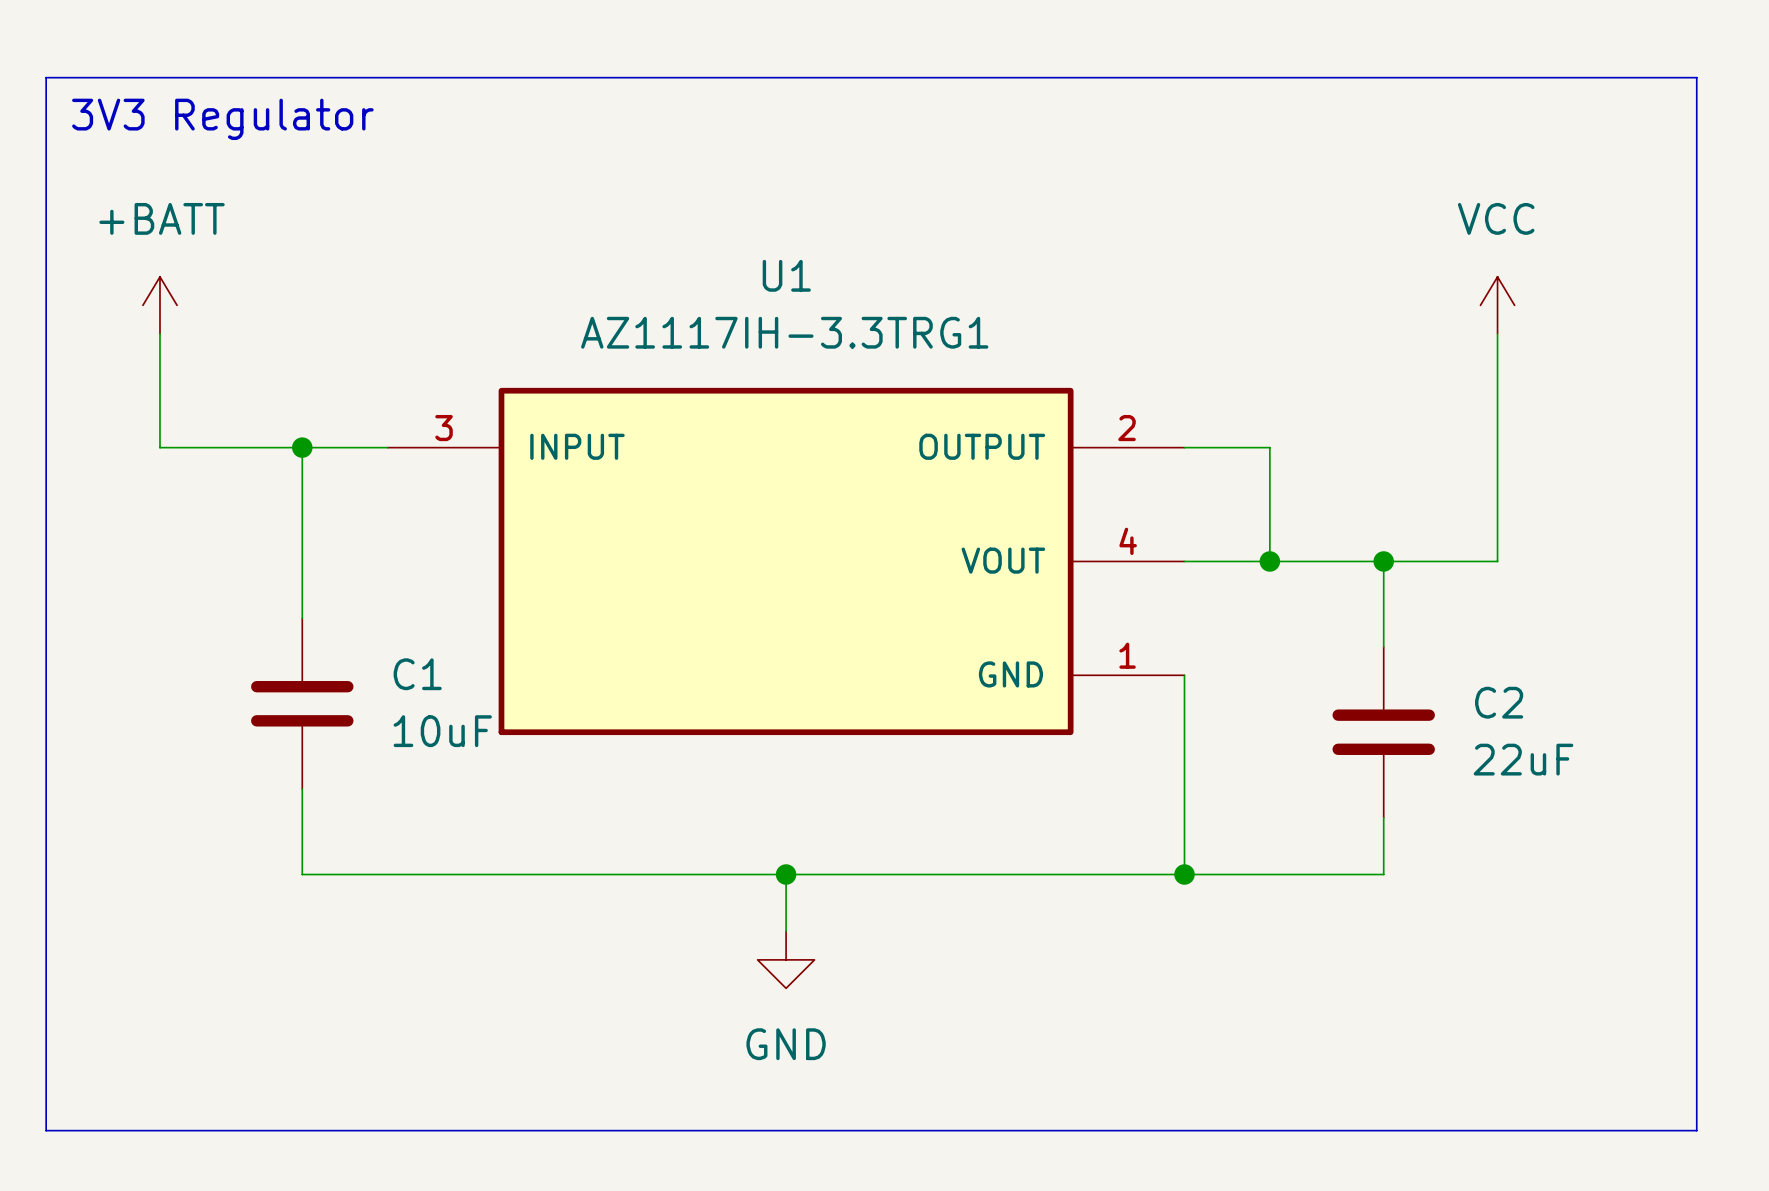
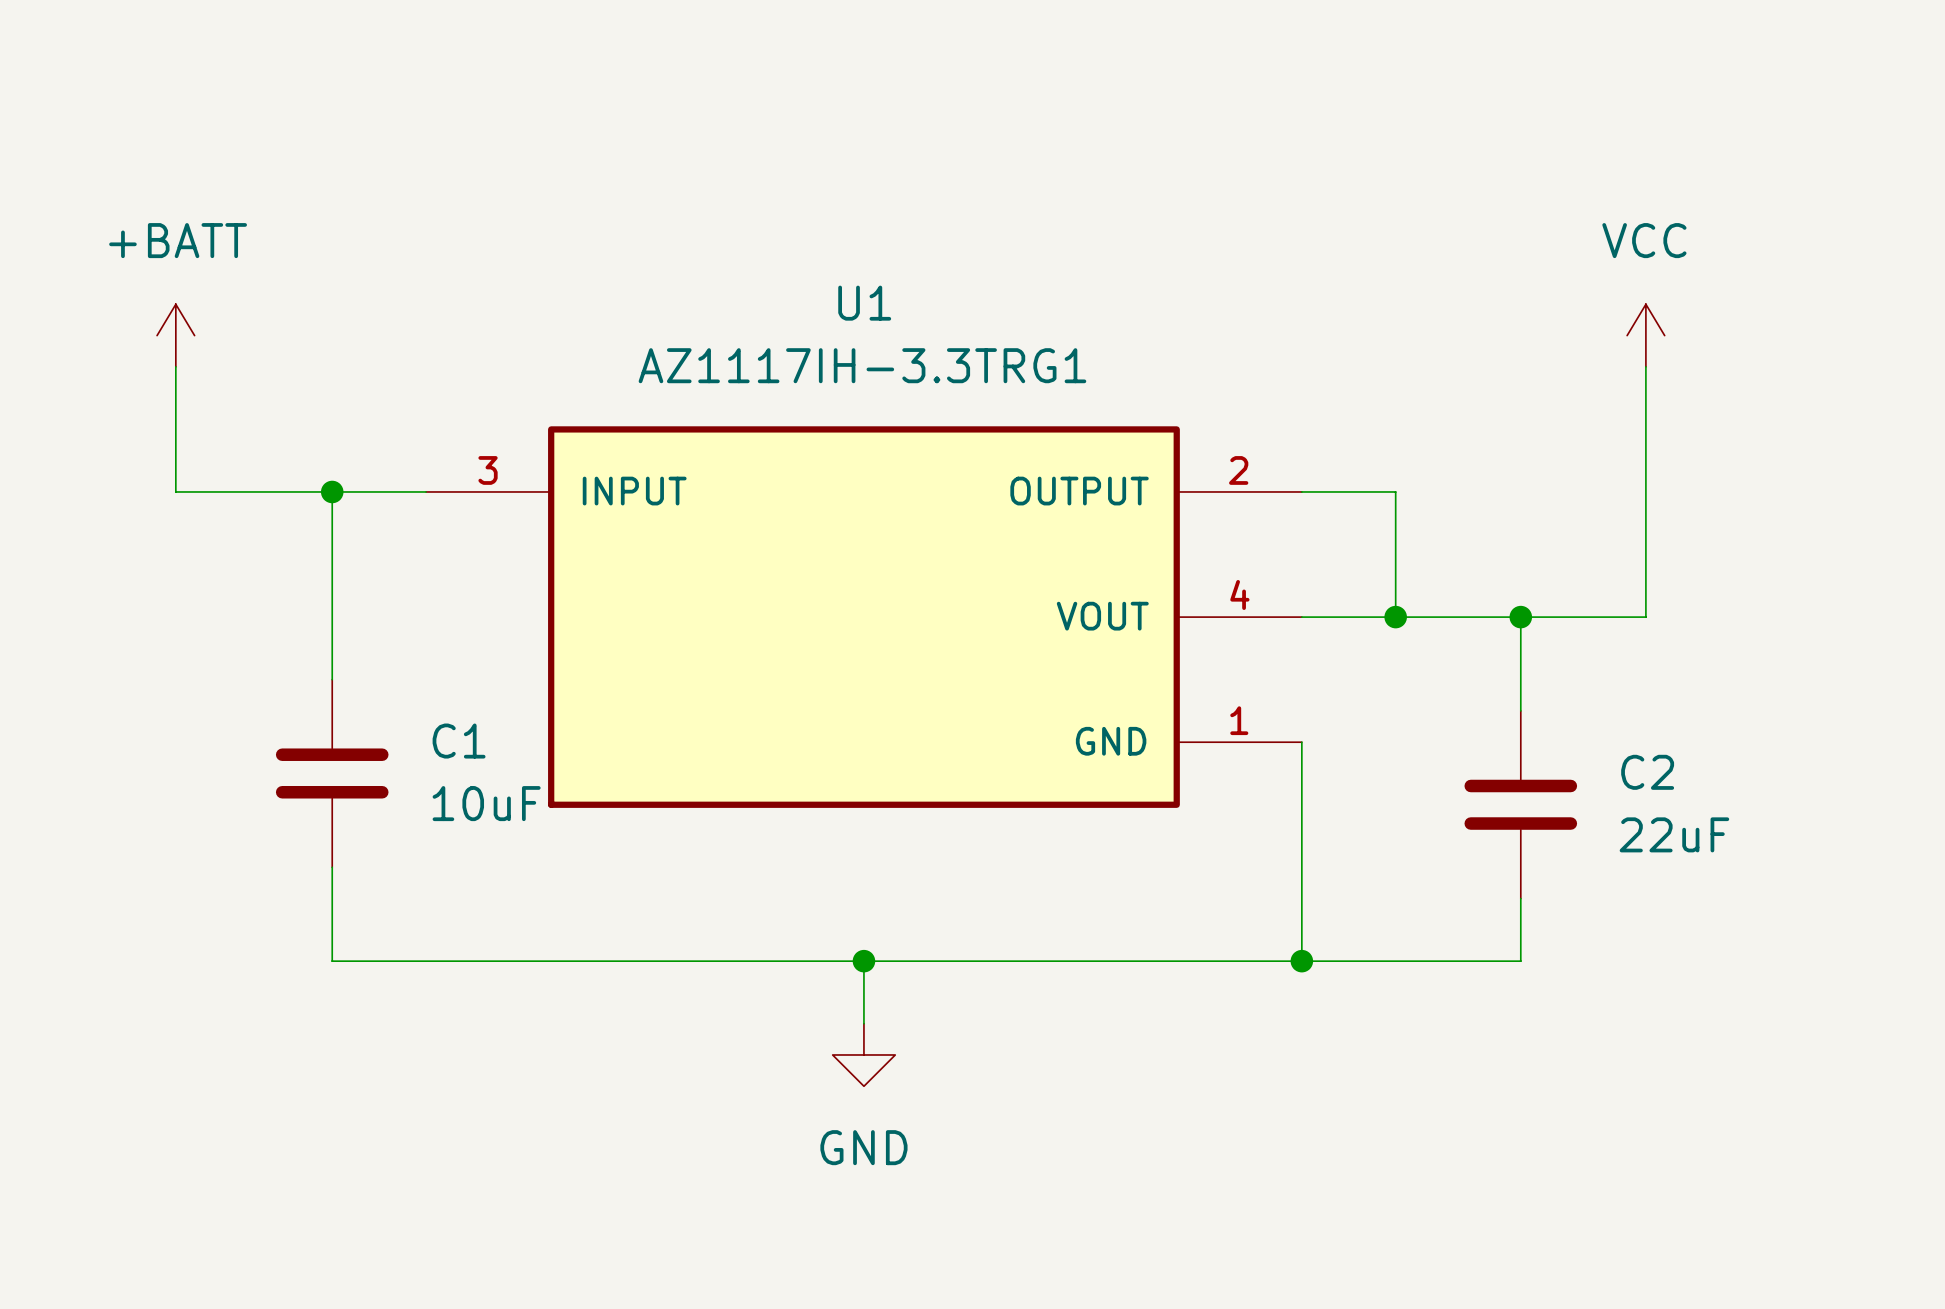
line: (46, 77) (1696, 77) (1696, 1130) (46, 1130) (46, 77) -> none
text: 3V3 Regulator (222, 119) -> none

